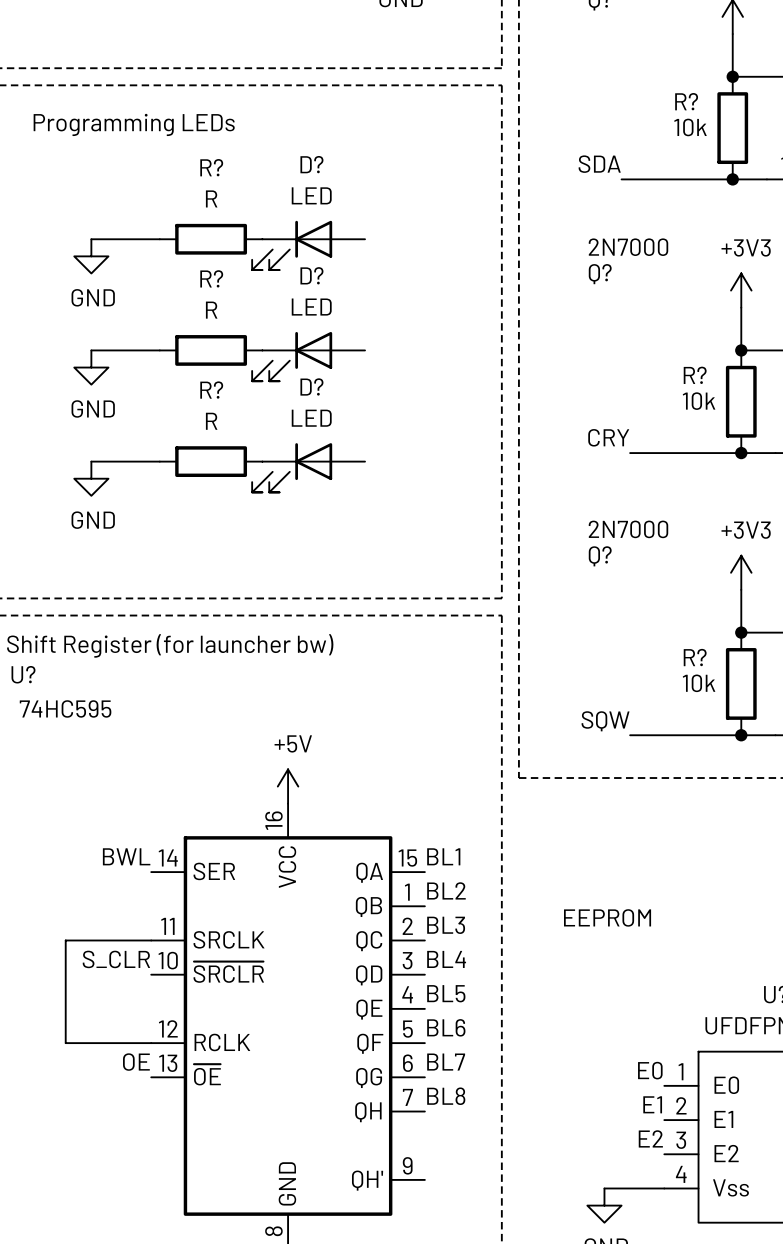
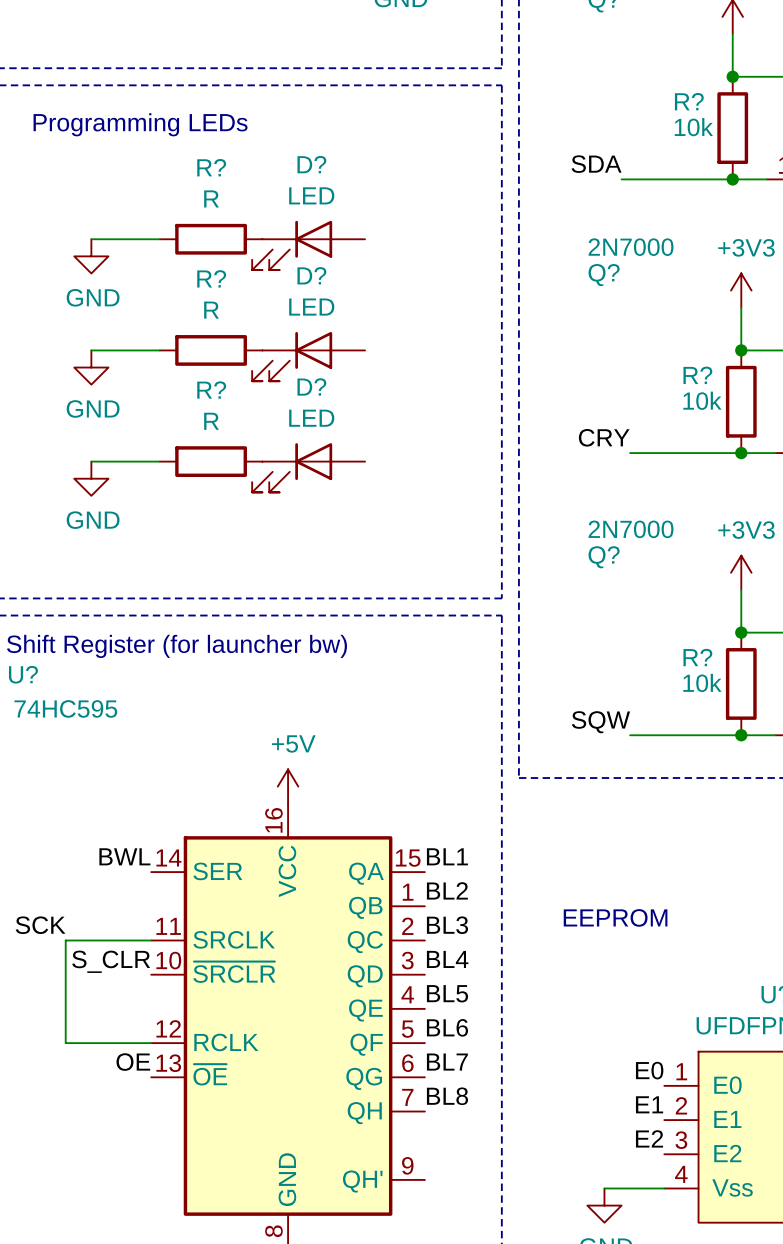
label: none -> SCK (40, 925)

